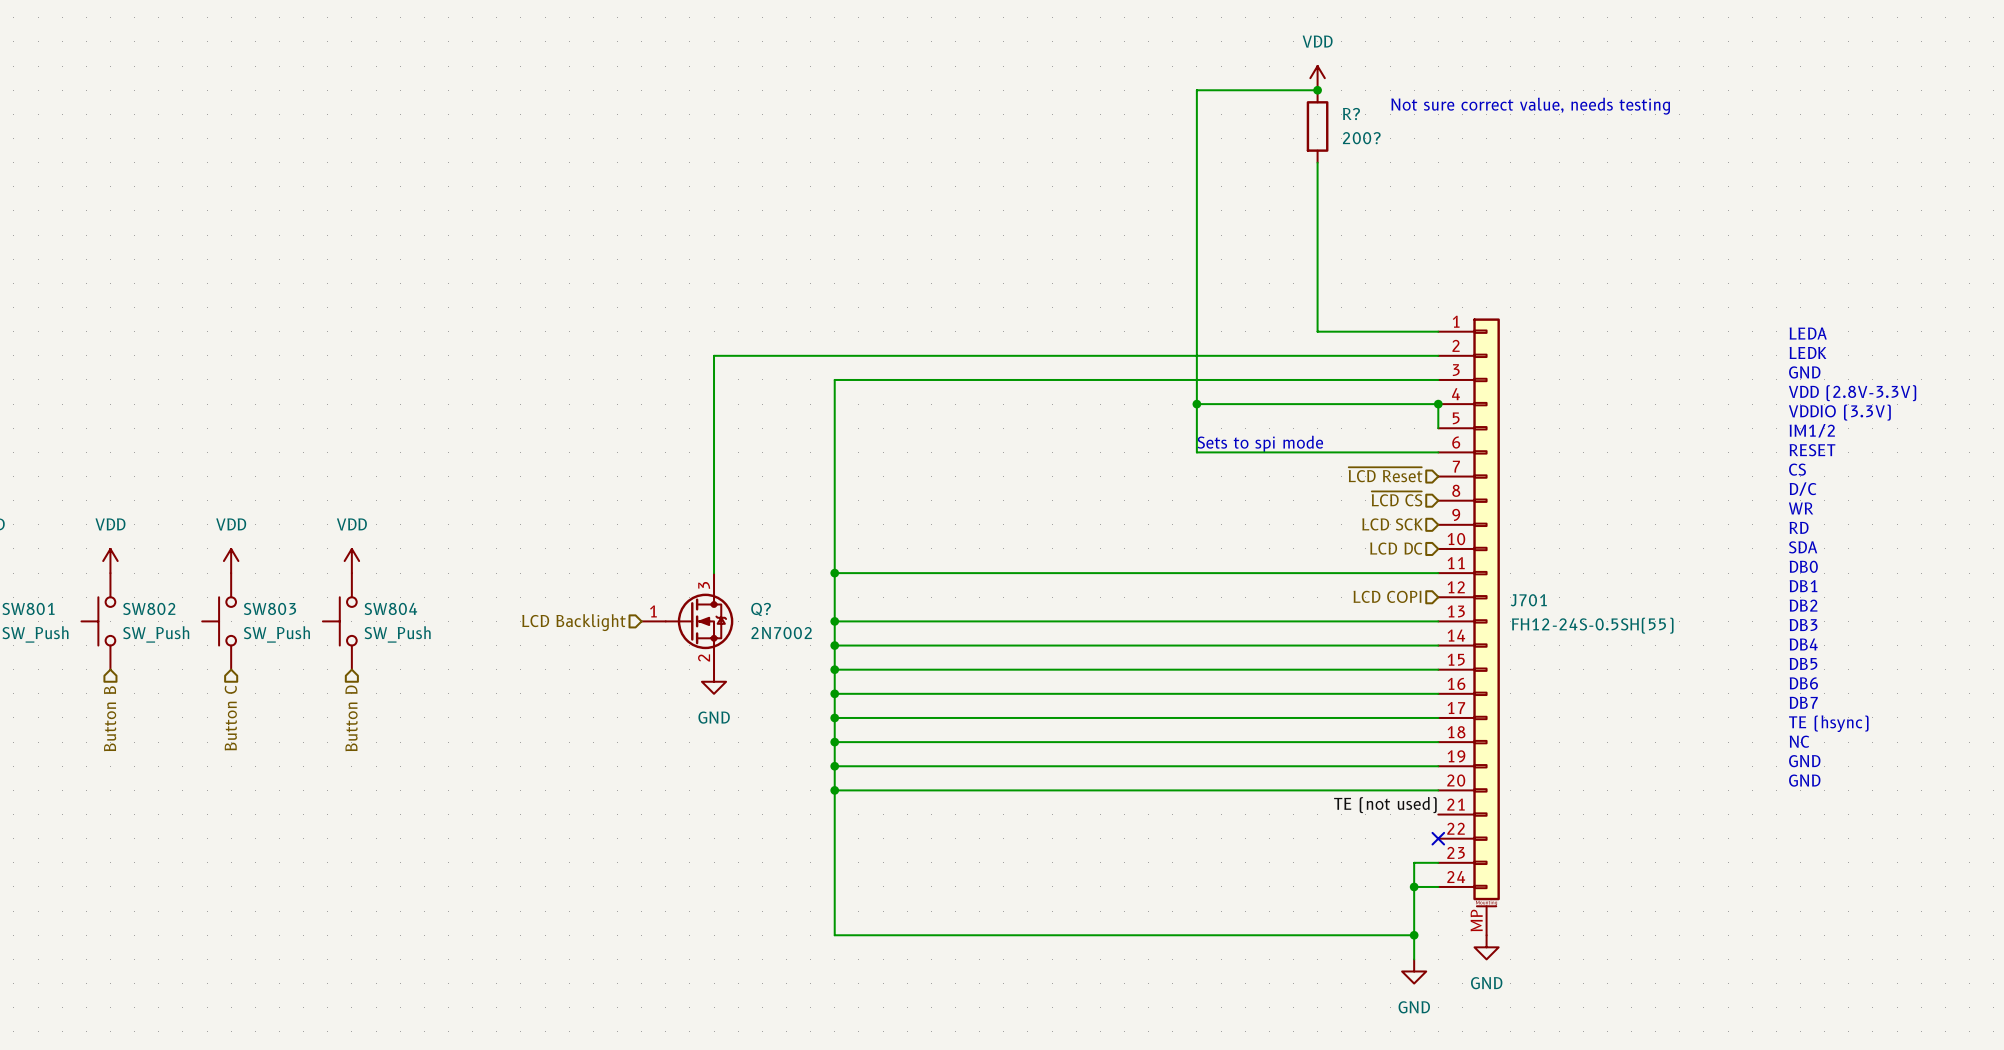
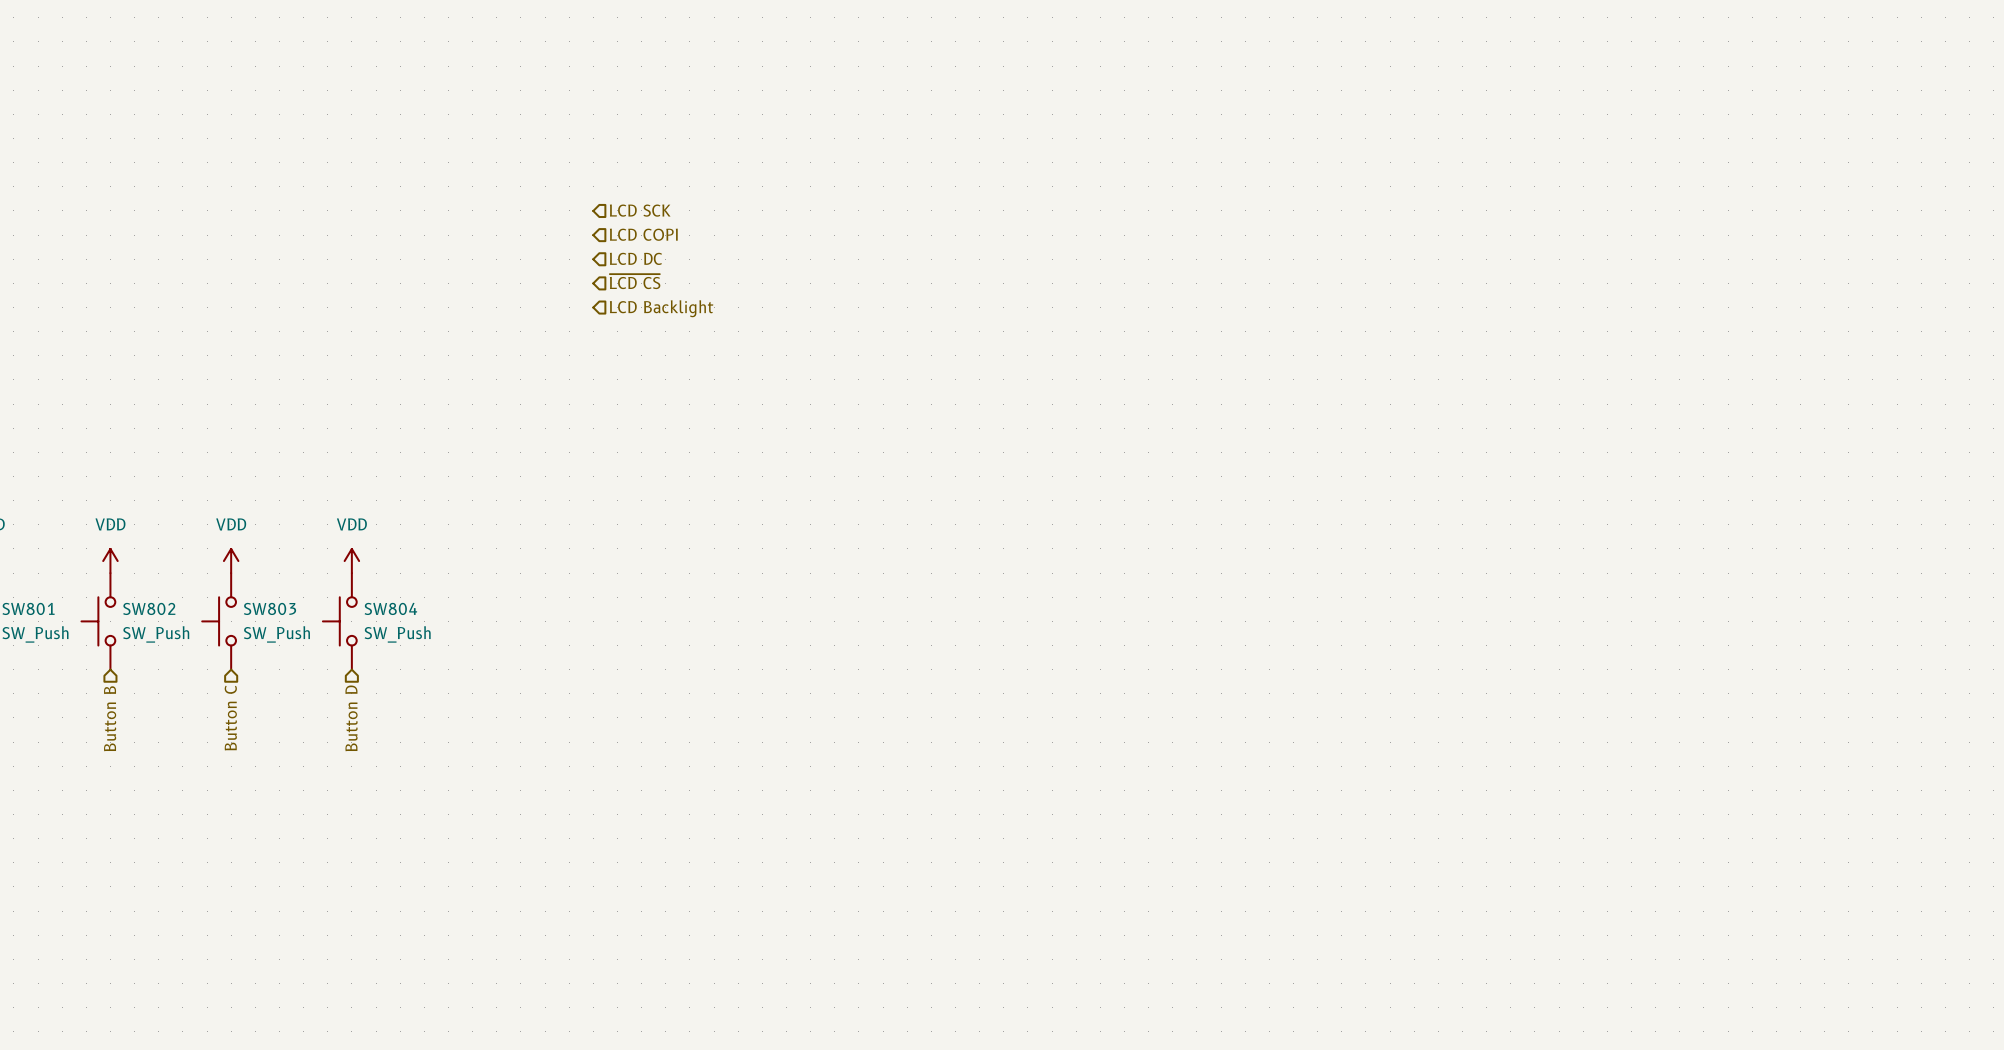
power symbol: VDD (1317, 78) -> none
wire: (1317, 90) (1196, 90) (1196, 452) (1438, 452) -> none
junction: (1317, 90) -> none
text: Not sure correct value, needs testing (1530, 106) -> none
R?: 200? (1317, 126) -> none
wire: (1317, 162) (1317, 331) (1438, 331) -> none
hierarchical label: none -> LCD SCK (640, 210)
hierarchical label: none -> LCD COPI (643, 234)
hierarchical label: none -> LCD DC (635, 258)
hierarchical label: none -> ~{LCD CS} (635, 281)
hierarchical label: none -> LCD Backlight (661, 308)
text: LEDA (1808, 333) -> none
text: LEDK (1808, 352) -> none
wire: (1438, 355) (714, 355) (714, 573) -> none
text: GND (1804, 372) -> none
wire: (1438, 379) (834, 379) (834, 935) (1414, 935) -> none
text: VDD (2.8V-3.3V) (1852, 393) -> none
wire: (1196, 404) (1438, 404) (1438, 428) -> none
junction: (1196, 404) -> none
junction: (1438, 404) -> none
text: VDDIO (3.3V) (1839, 412) -> none
text: IM1/2 (1812, 430) -> none
text: Sets to spi mode (1260, 444) -> none
text: RESET (1812, 450) -> none
text: CS (1797, 469) -> none
hierarchical label: ~{LCD Reset} (1385, 474) -> none
text: D/C (1803, 489) -> none
hierarchical label: ~{LCD CS} (1397, 498) -> none
text: WR (1801, 508) -> none
hierarchical label: LCD SCK (1392, 524) -> none
text: RD (1799, 527) -> none
text: SDA (1803, 547) -> none
hierarchical label: LCD DC (1396, 548) -> none
text: DB0 (1803, 566) -> none
wire: (834, 573) (1438, 573) -> none
junction: (834, 573) -> none
text: DB1 (1803, 586) -> none
hierarchical label: LCD COPI (1387, 596) -> none
text: DB2 (1803, 605) -> none
Q?: 2N7002 (687, 621) -> none
wire: (834, 621) (1438, 621) -> none
junction: (834, 621) -> none
hierarchical label: LCD Backlight (573, 622) -> none
text: DB3 (1803, 625) -> none
J701: FH12-24S-0.5SH(55) (1469, 626) -> none
text: DB4 (1803, 644) -> none
wire: (834, 645) (1438, 645) -> none
junction: (834, 645) -> none
text: DB5 (1803, 663) -> none
wire: (834, 669) (1438, 669) -> none
junction: (834, 669) -> none
power symbol: GND (714, 681) -> none
text: DB6 (1803, 683) -> none
wire: (834, 693) (1438, 693) -> none
junction: (834, 693) -> none
text: DB7 (1803, 702) -> none
wire: (834, 717) (1438, 717) -> none
junction: (834, 717) -> none
text: TE (hsync) (1828, 723) -> none
text: NC (1799, 741) -> none
wire: (834, 742) (1438, 742) -> none
junction: (834, 742) -> none
text: GND (1804, 761) -> none
wire: (834, 766) (1438, 766) -> none
junction: (834, 766) -> none
text: GND (1804, 780) -> none
wire: (834, 790) (1438, 790) -> none
junction: (834, 790) -> none
label: TE (not used) (1385, 805) -> none
no-connect mark: (1438, 838) -> none
wire: (1438, 862) (1414, 862) (1414, 959) -> none
wire: (1414, 886) (1438, 886) -> none
junction: (1414, 886) -> none
junction: (1414, 935) -> none
power symbol: GND (1486, 947) -> none
power symbol: GND (1414, 971) -> none

